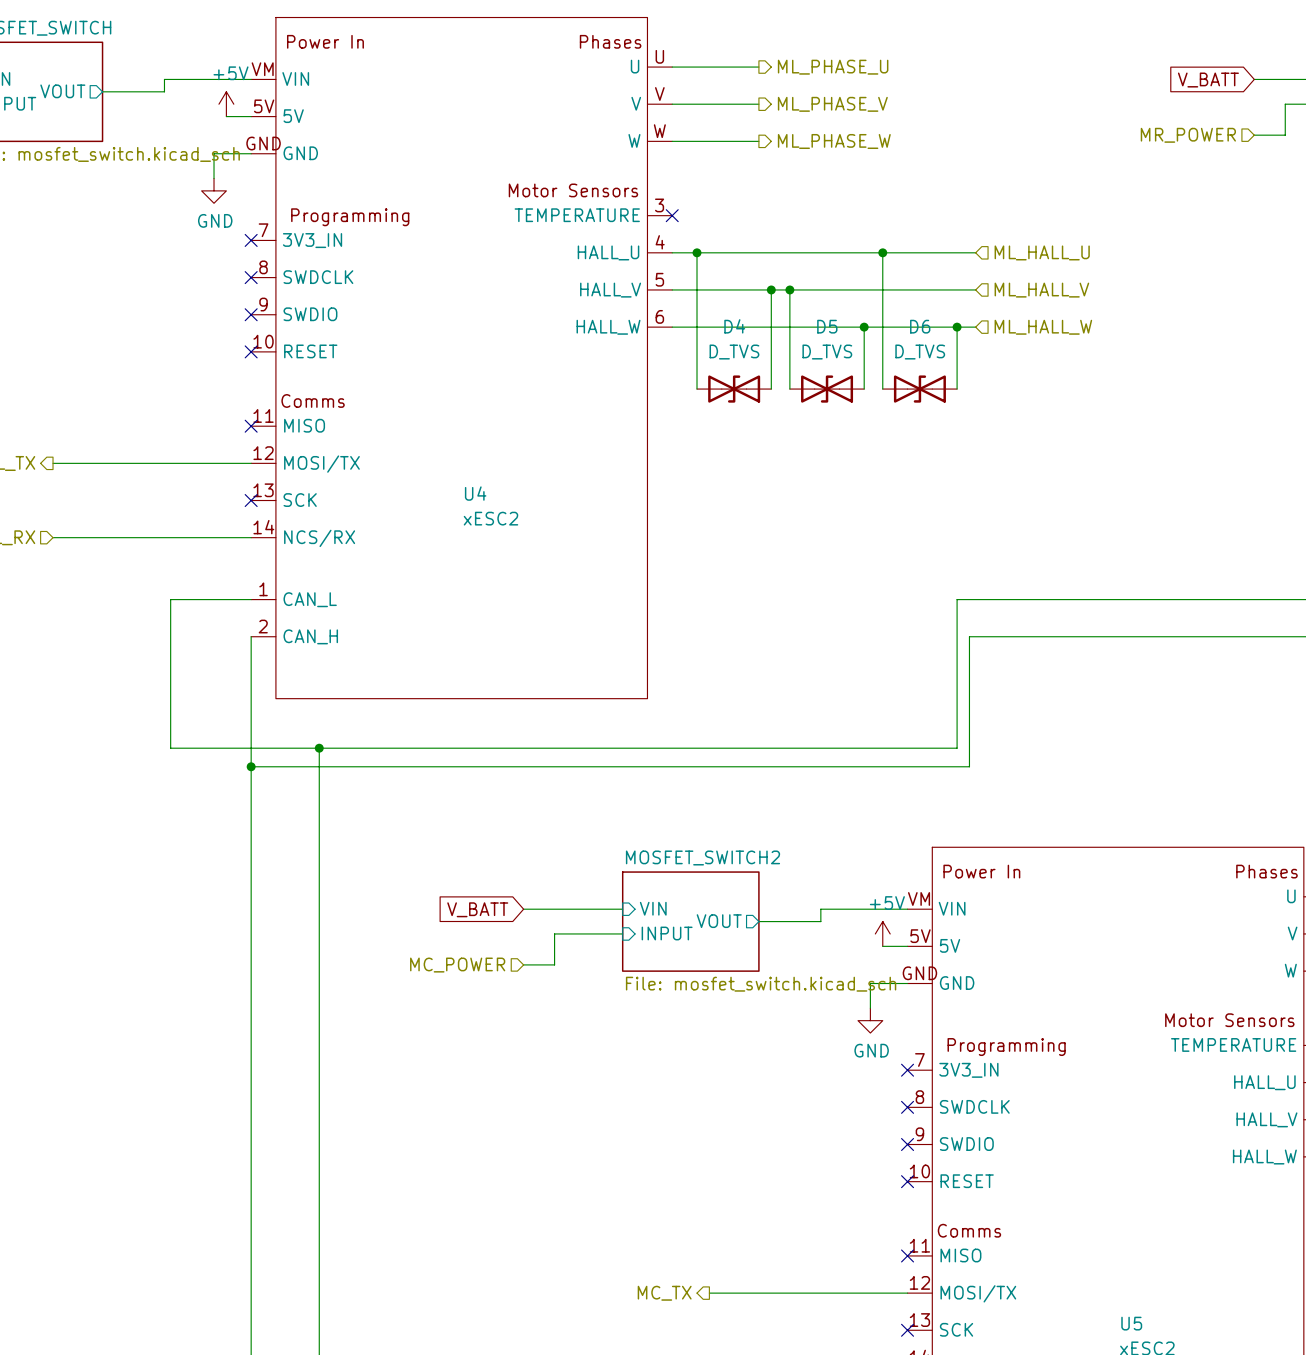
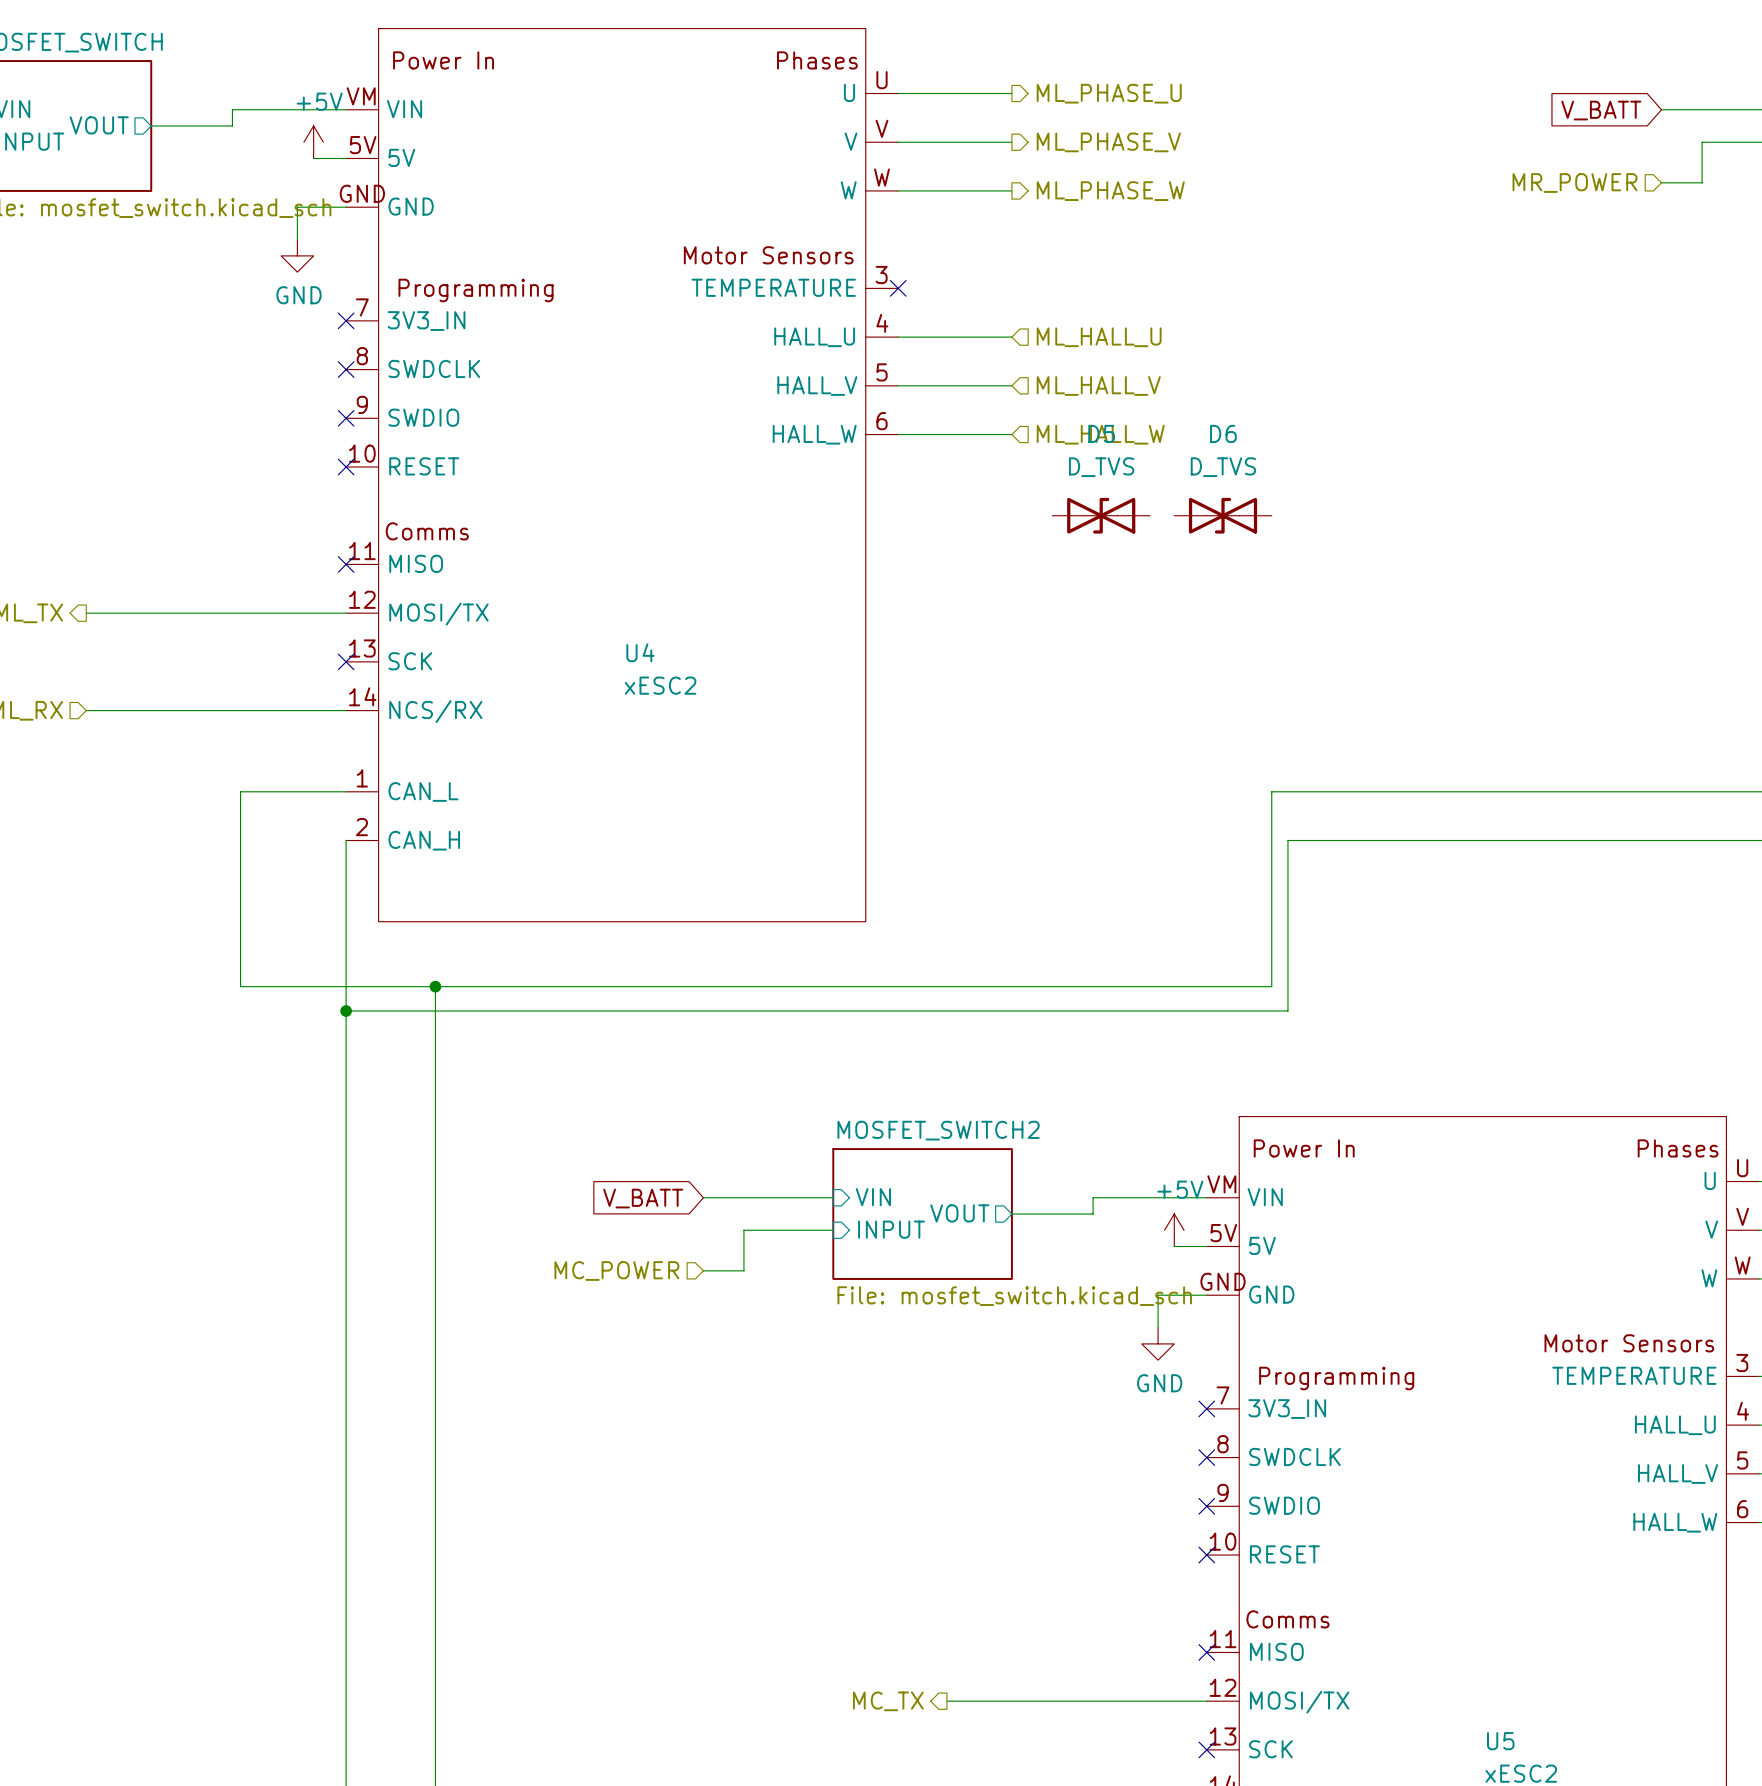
wire: (697, 252) (697, 389) -> none
junction: (697, 252) -> none
wire: (758, 252) (975, 252) -> none
wire: (882, 252) (882, 389) -> none
junction: (882, 252) -> none
hierarchical label position: ML_HALL_U (1042, 252) -> ML_HALL_U (1099, 337)
wire: (758, 289) (975, 289) -> none
wire: (771, 289) (771, 389) -> none
junction: (771, 289) -> none
wire: (789, 289) (789, 389) -> none
junction: (789, 289) -> none
hierarchical label position: ML_HALL_V (1041, 290) -> ML_HALL_V (1098, 385)
wire: (758, 327) (975, 327) -> none
wire: (864, 327) (864, 389) -> none
junction: (864, 327) -> none
wire: (957, 327) (957, 389) -> none
junction: (957, 327) -> none
hierarchical label position: ML_HALL_W (1043, 327) -> ML_HALL_W (1100, 434)
D4: D_TVS (734, 389) -> none

